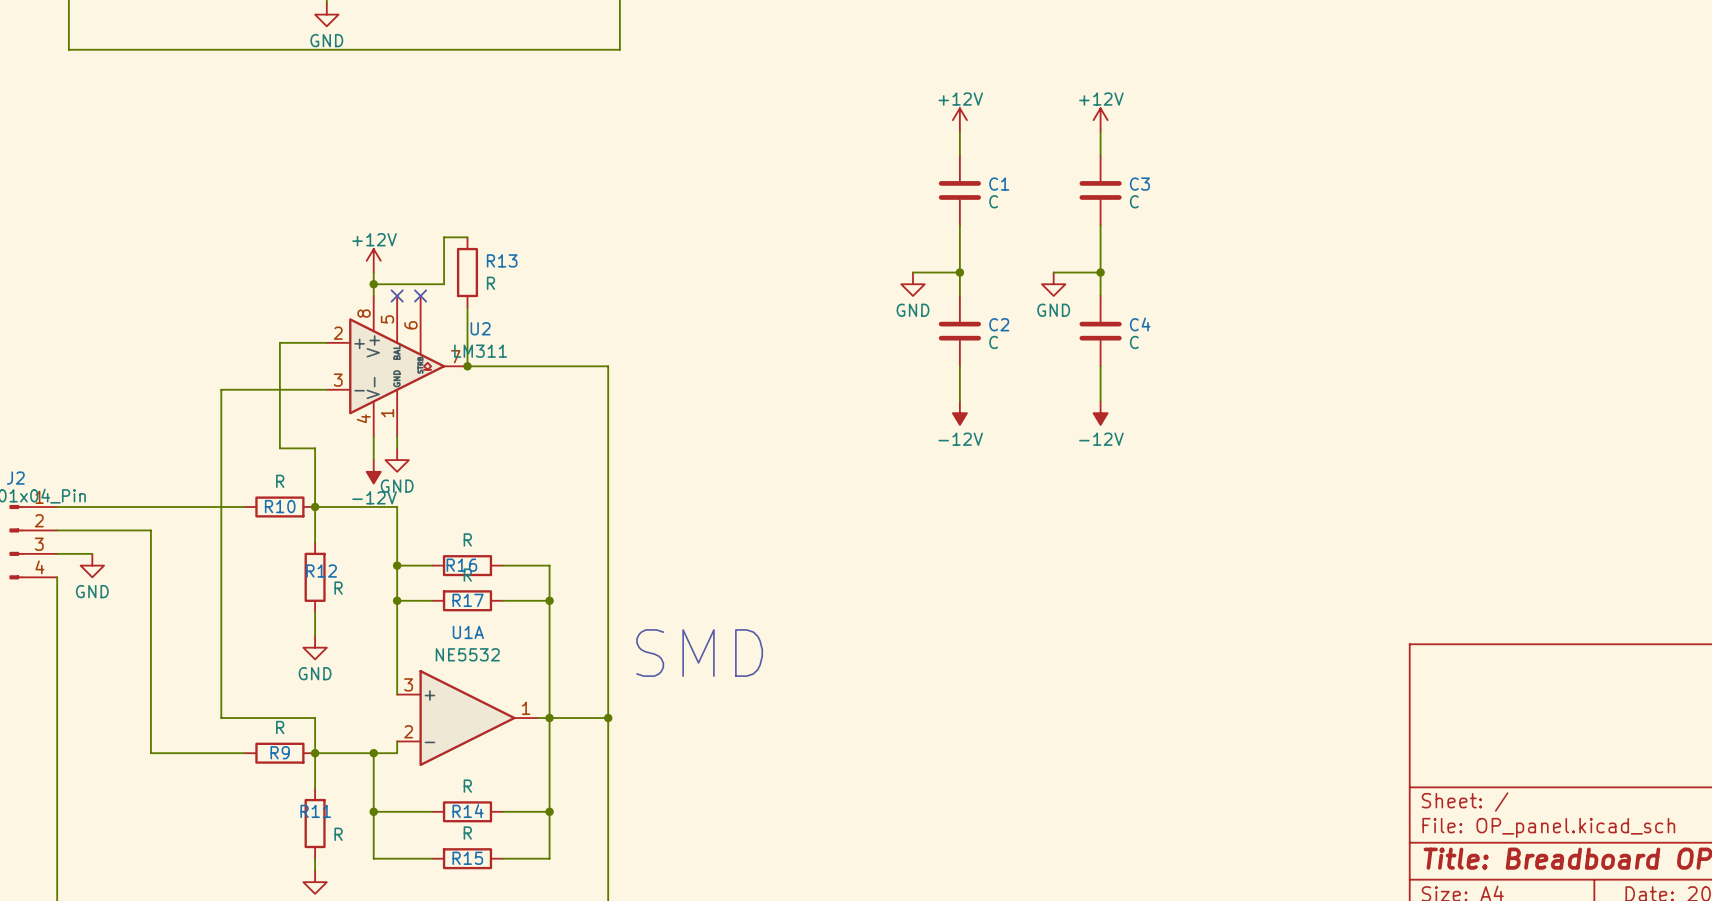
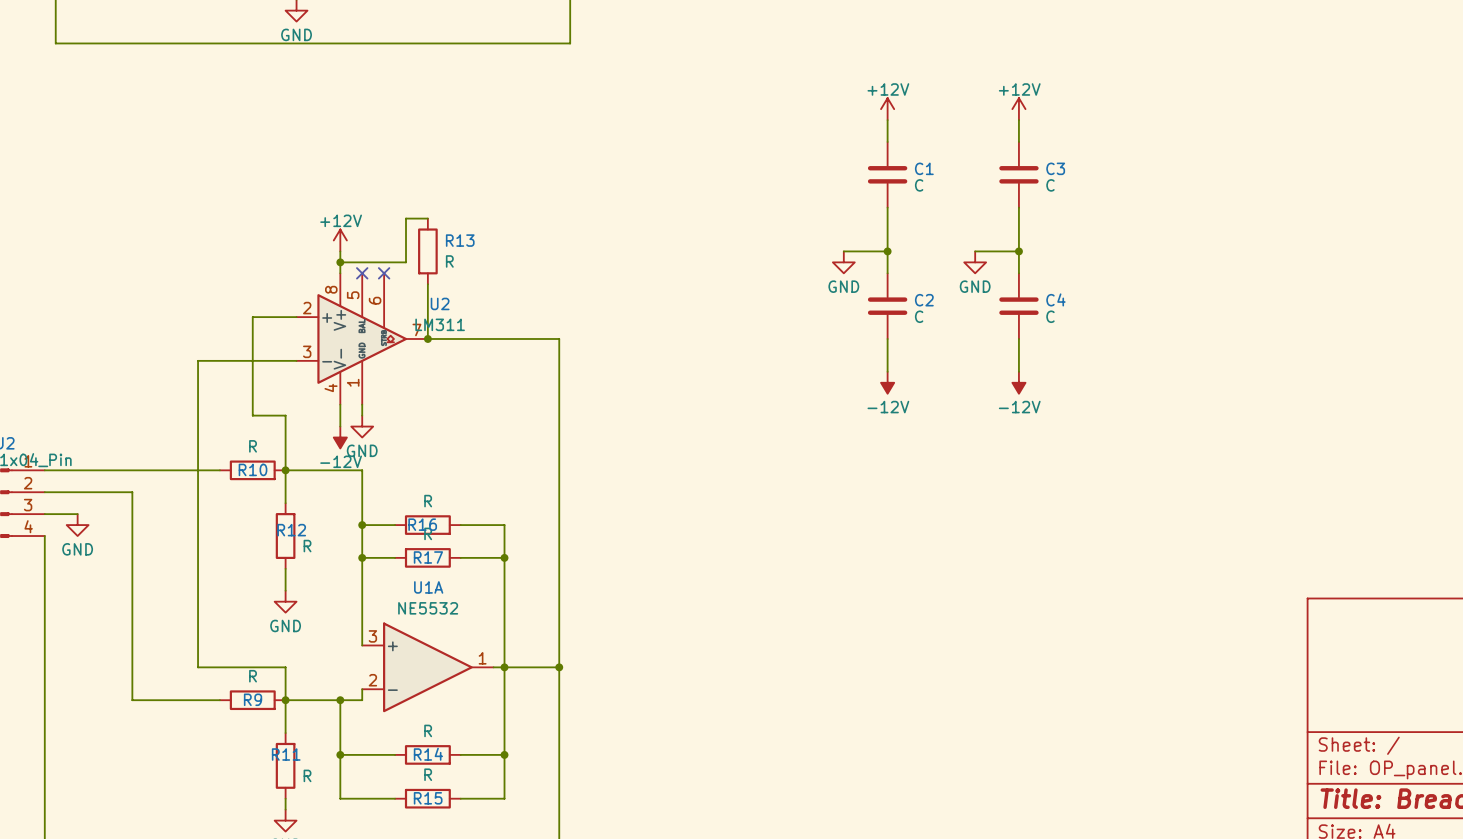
text: SMD (699, 653) -> none

